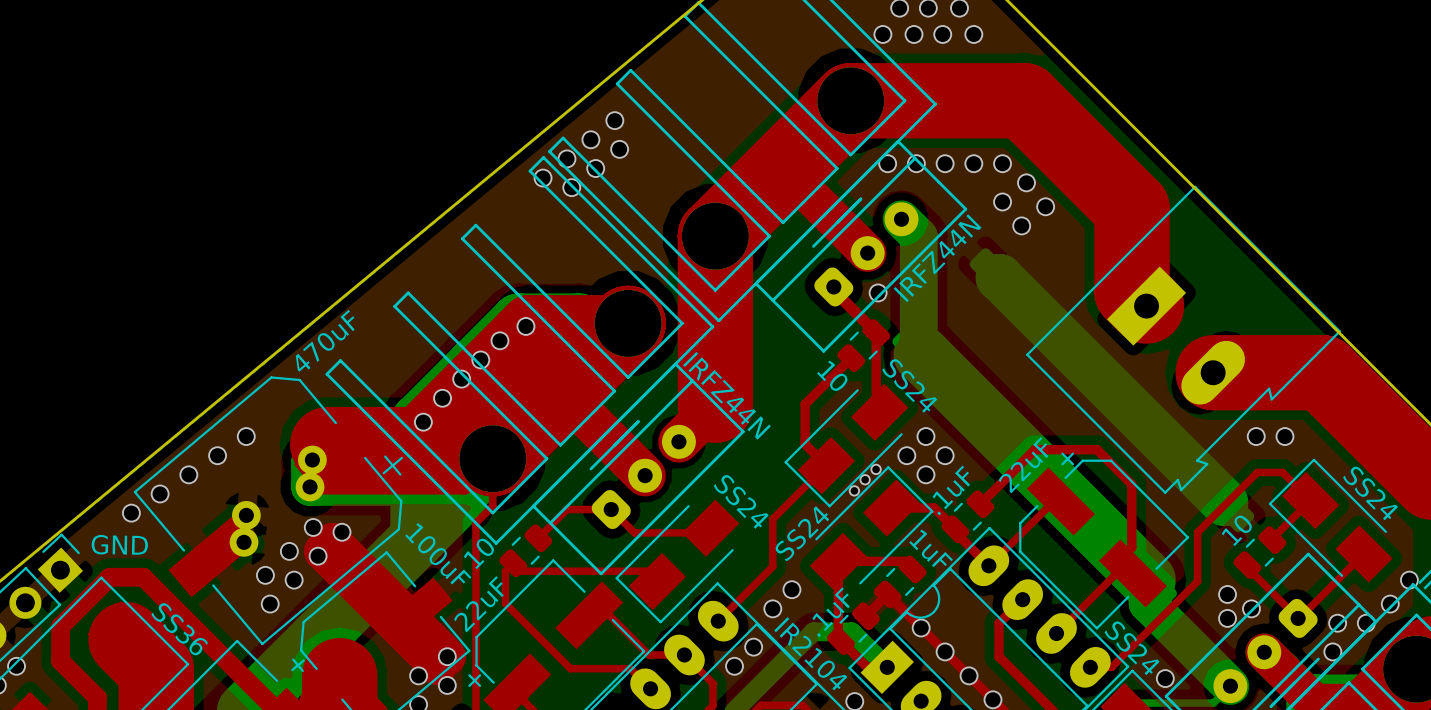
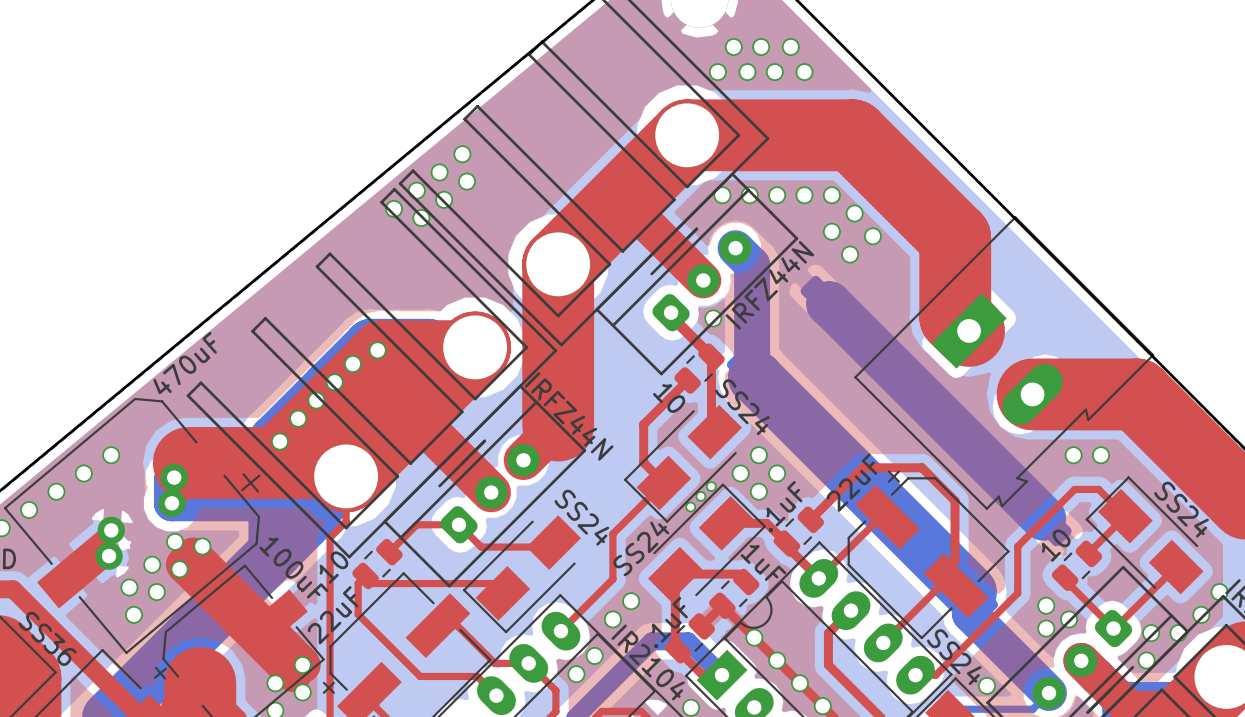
top track: (492, 458) (464, 486) (310, 486) -> none

